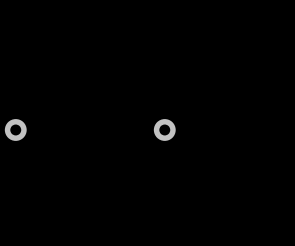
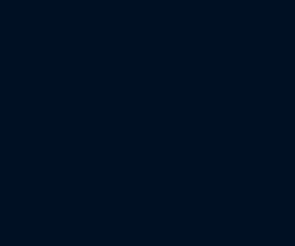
via: (15, 129) -> none
via: (164, 129) -> none

